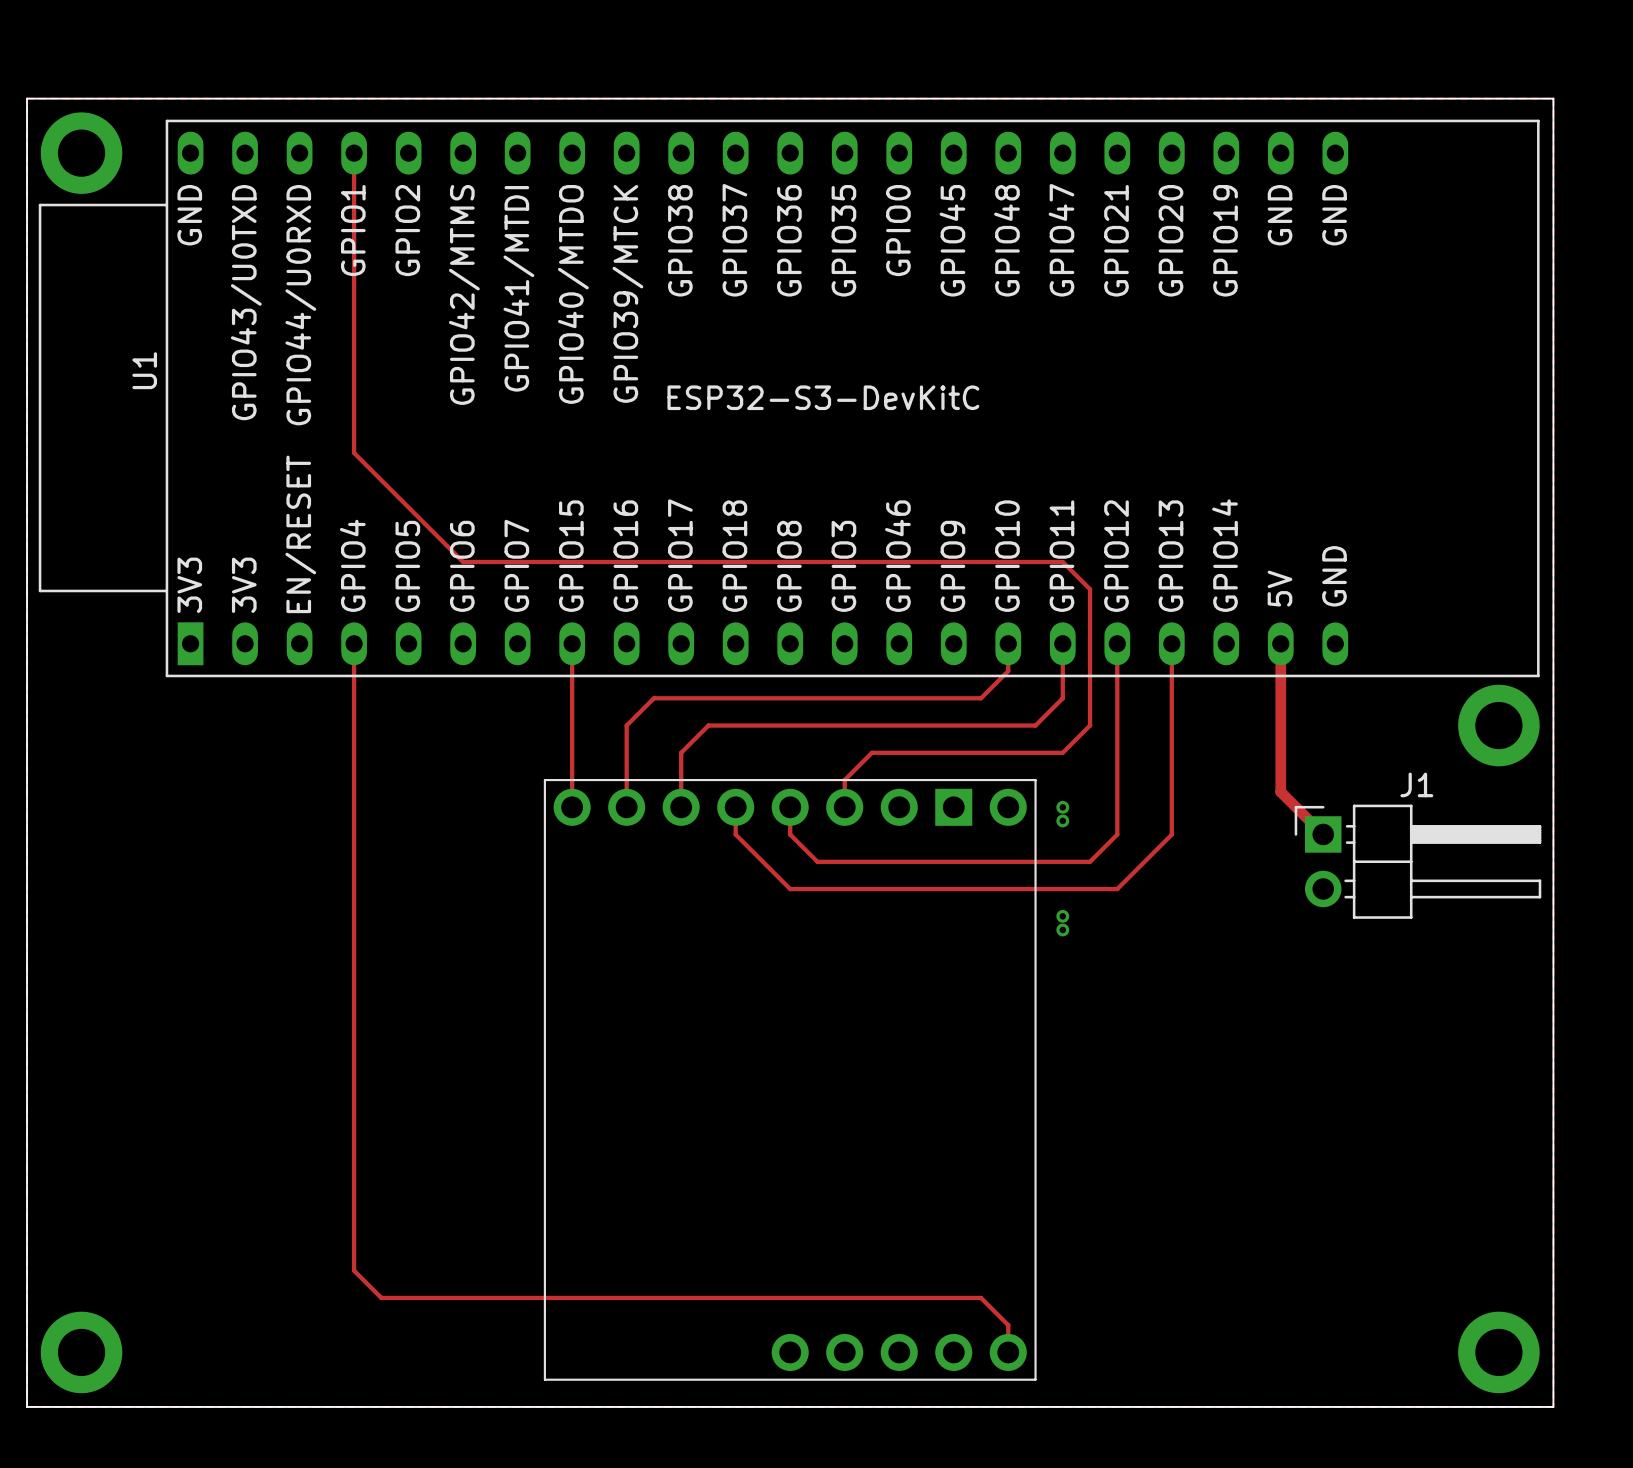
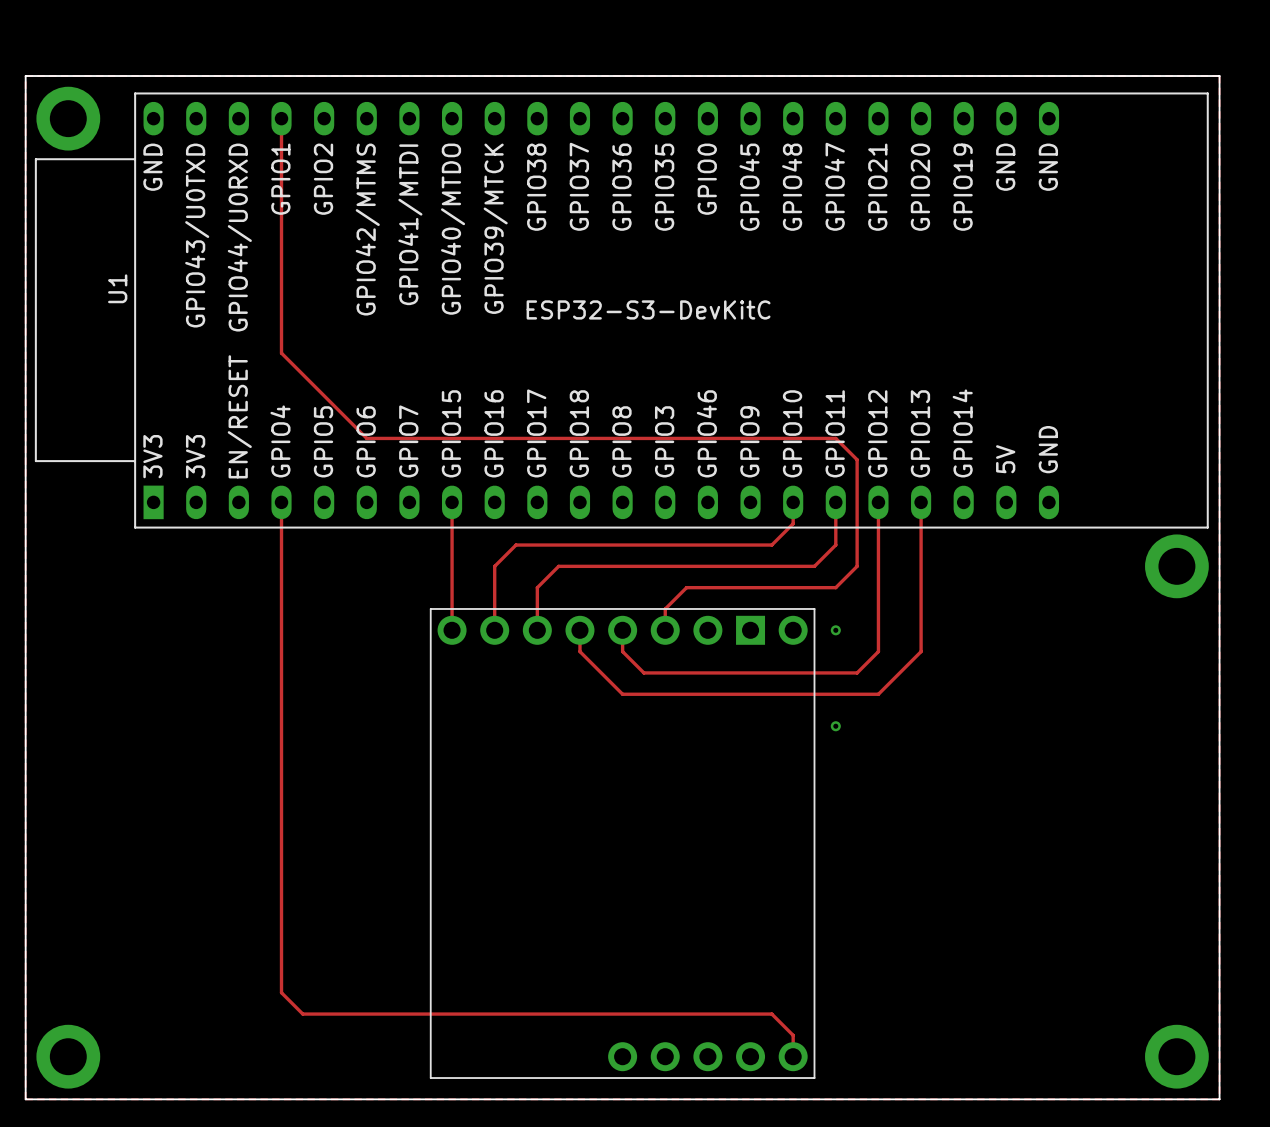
track: (1280, 643) (1280, 792) (1323, 834) -> none
via: (1062, 820) -> none
J1: (1417, 861) -> none
via: (1062, 916) -> none

